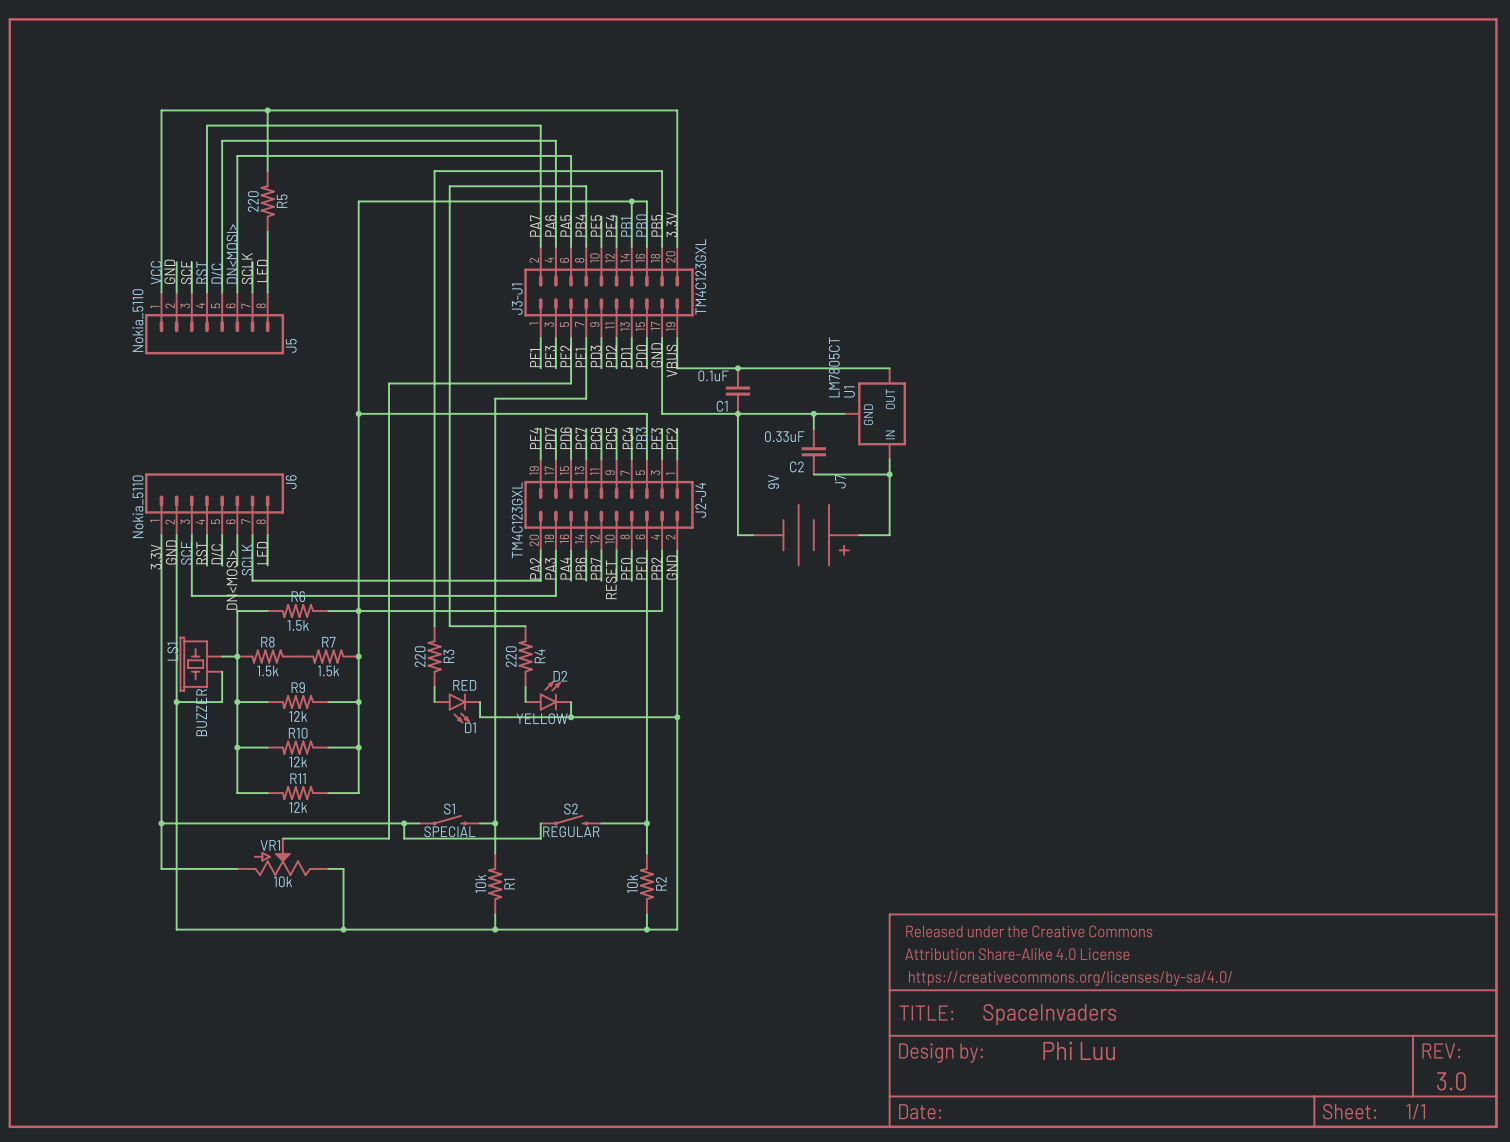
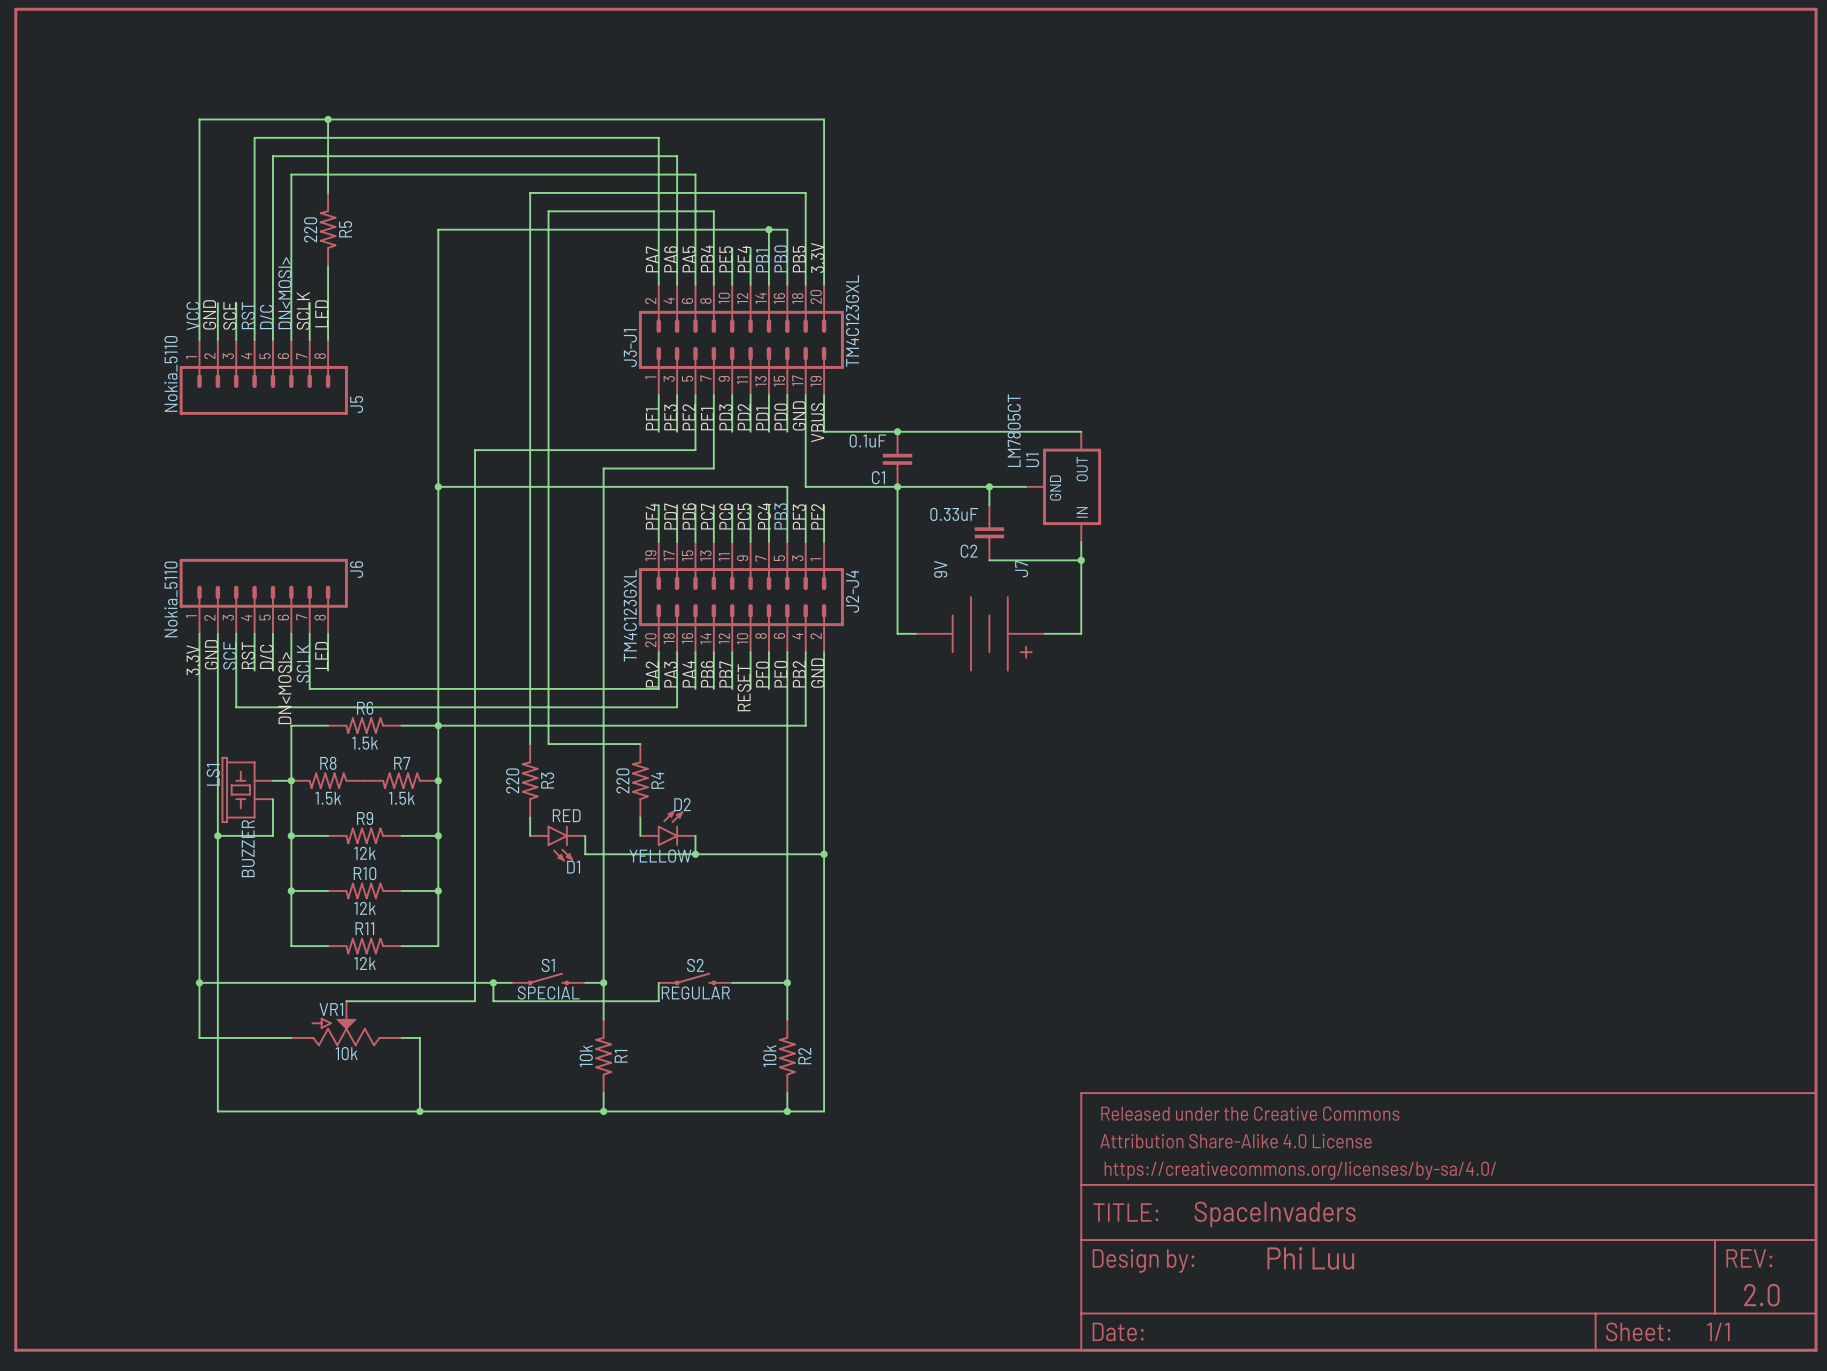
text: 3.0 (1451, 1081) -> 2.0 (1761, 1295)

